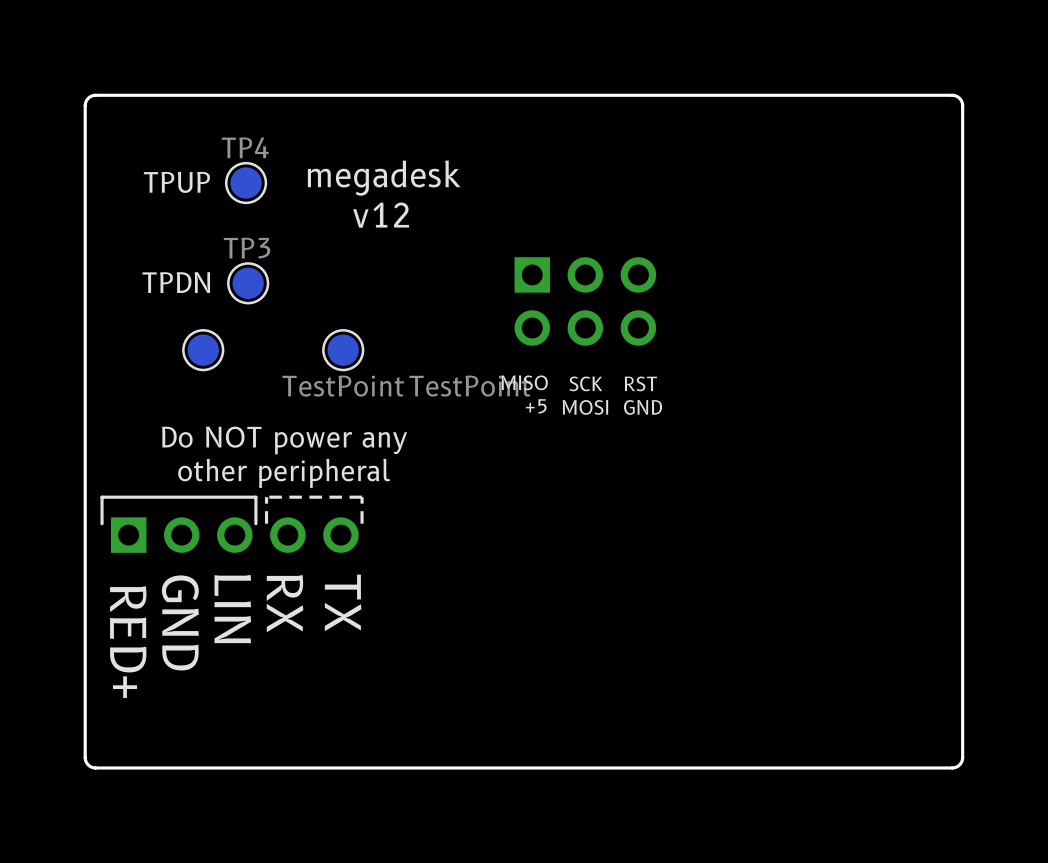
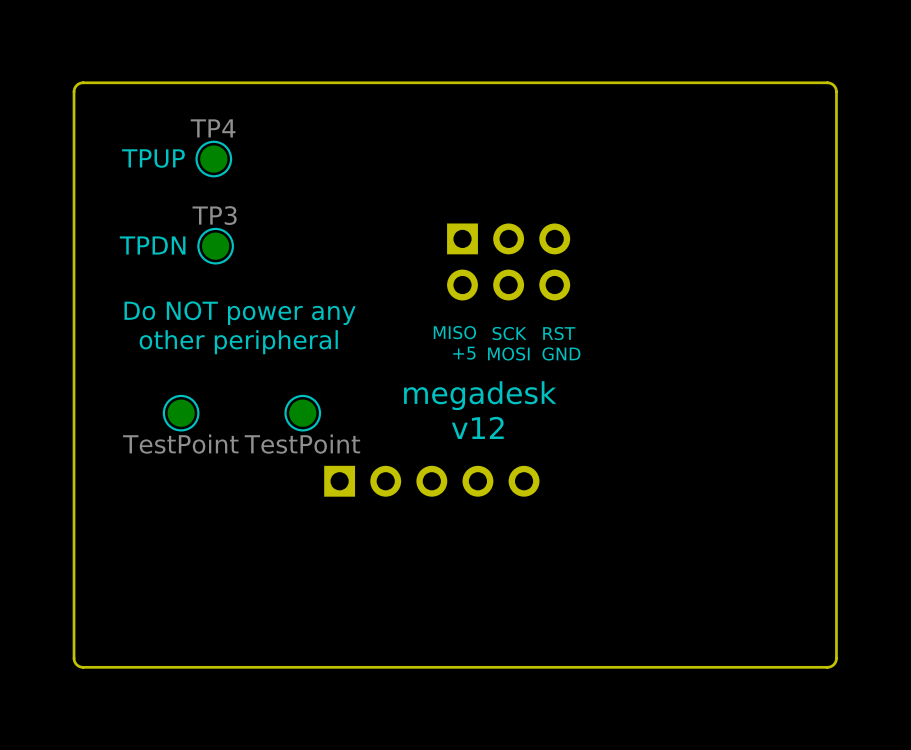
text position: megadesk (384, 178) -> megadesk (480, 395)
text position: v12 (381, 215) -> v12 (477, 427)
part: TestPoint (203, 350) -> none
part: TestPoint (343, 350) -> none
text position: Do NOT power any (284, 440) -> Do NOT power any (240, 313)
text position: other peripheral (284, 473) -> other peripheral (238, 342)
part: none -> TestPoint (181, 413)
part: none -> TestPoint (302, 413)
line: (255, 523) (255, 497) (102, 497) (102, 523) -> none
line: (362, 523) (362, 497) (266, 497) (266, 523) -> none
part position: (234, 535) -> (431, 481)
text: TX (343, 602) -> none
text: RX (285, 603) -> none
text: LIN (232, 609) -> none
text: GND (180, 622) -> none
text: RED+ (128, 642) -> none

